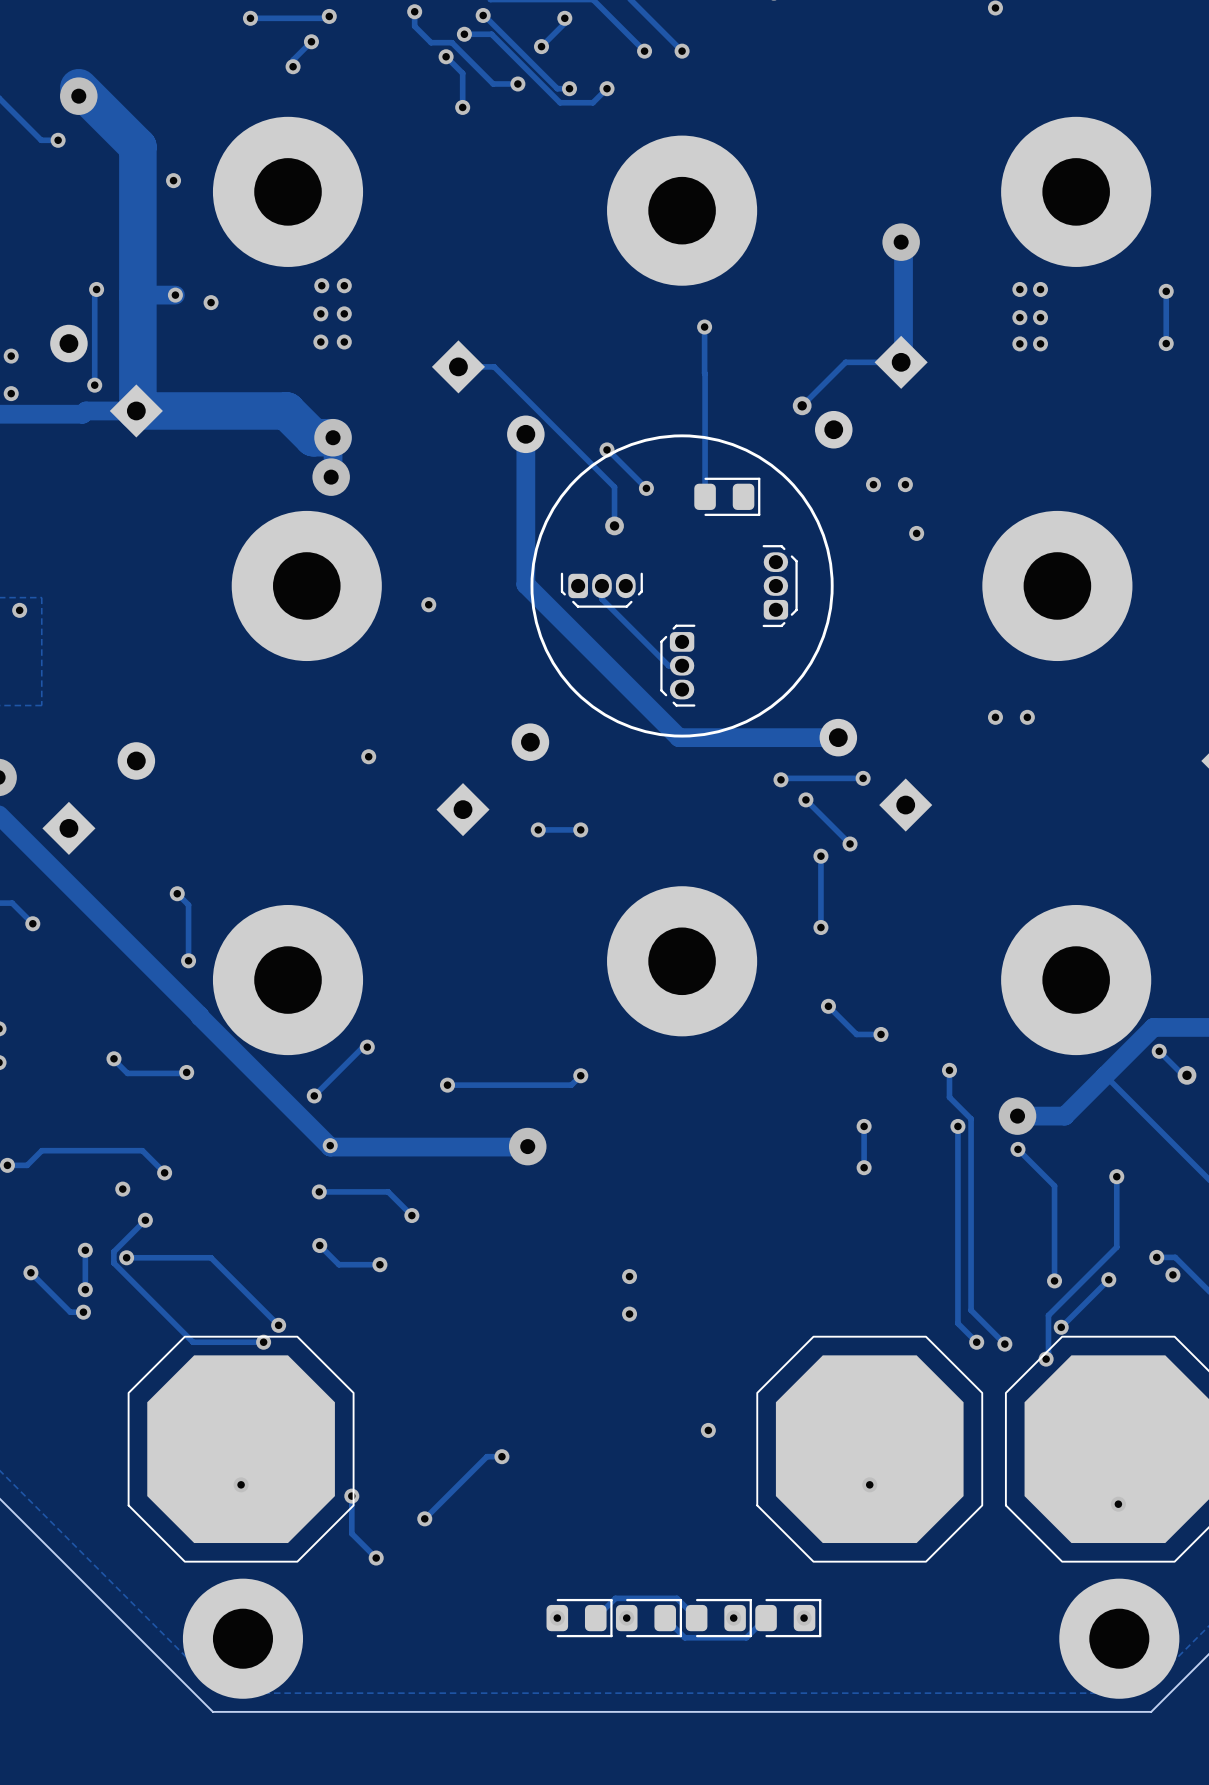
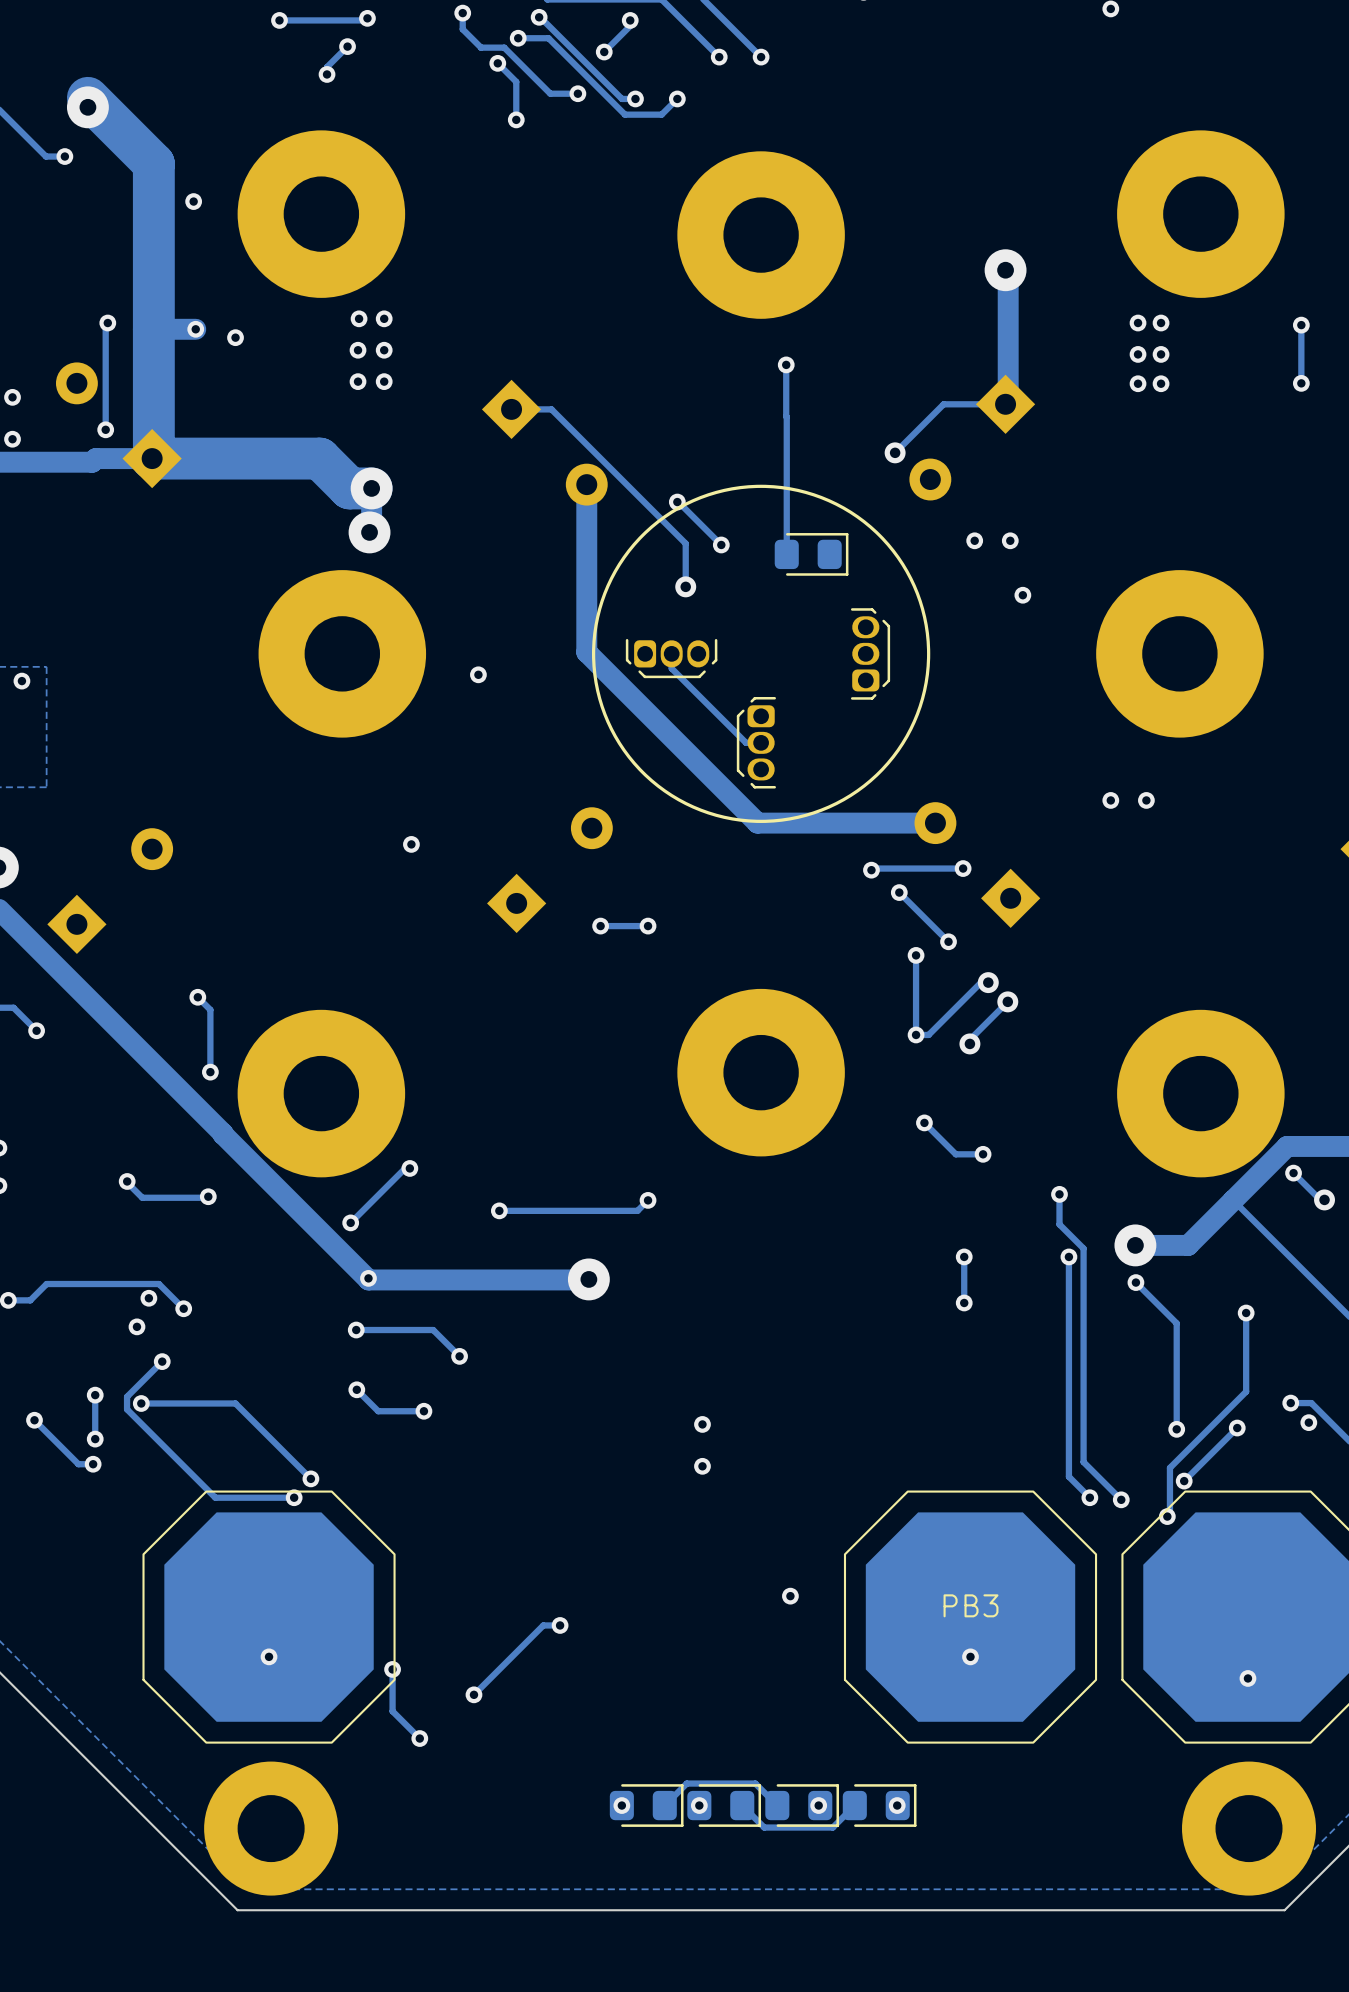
track: none -> (988, 982) (980, 982) (928, 1034) (916, 1034)
via: none -> (988, 982)
track: none -> (1007, 1001) (969, 1039) (969, 1043)
via: none -> (1007, 1001)
via: none -> (969, 1043)
via: none -> (148, 1298)
PB3 name: none -> PB3 (971, 1605)

